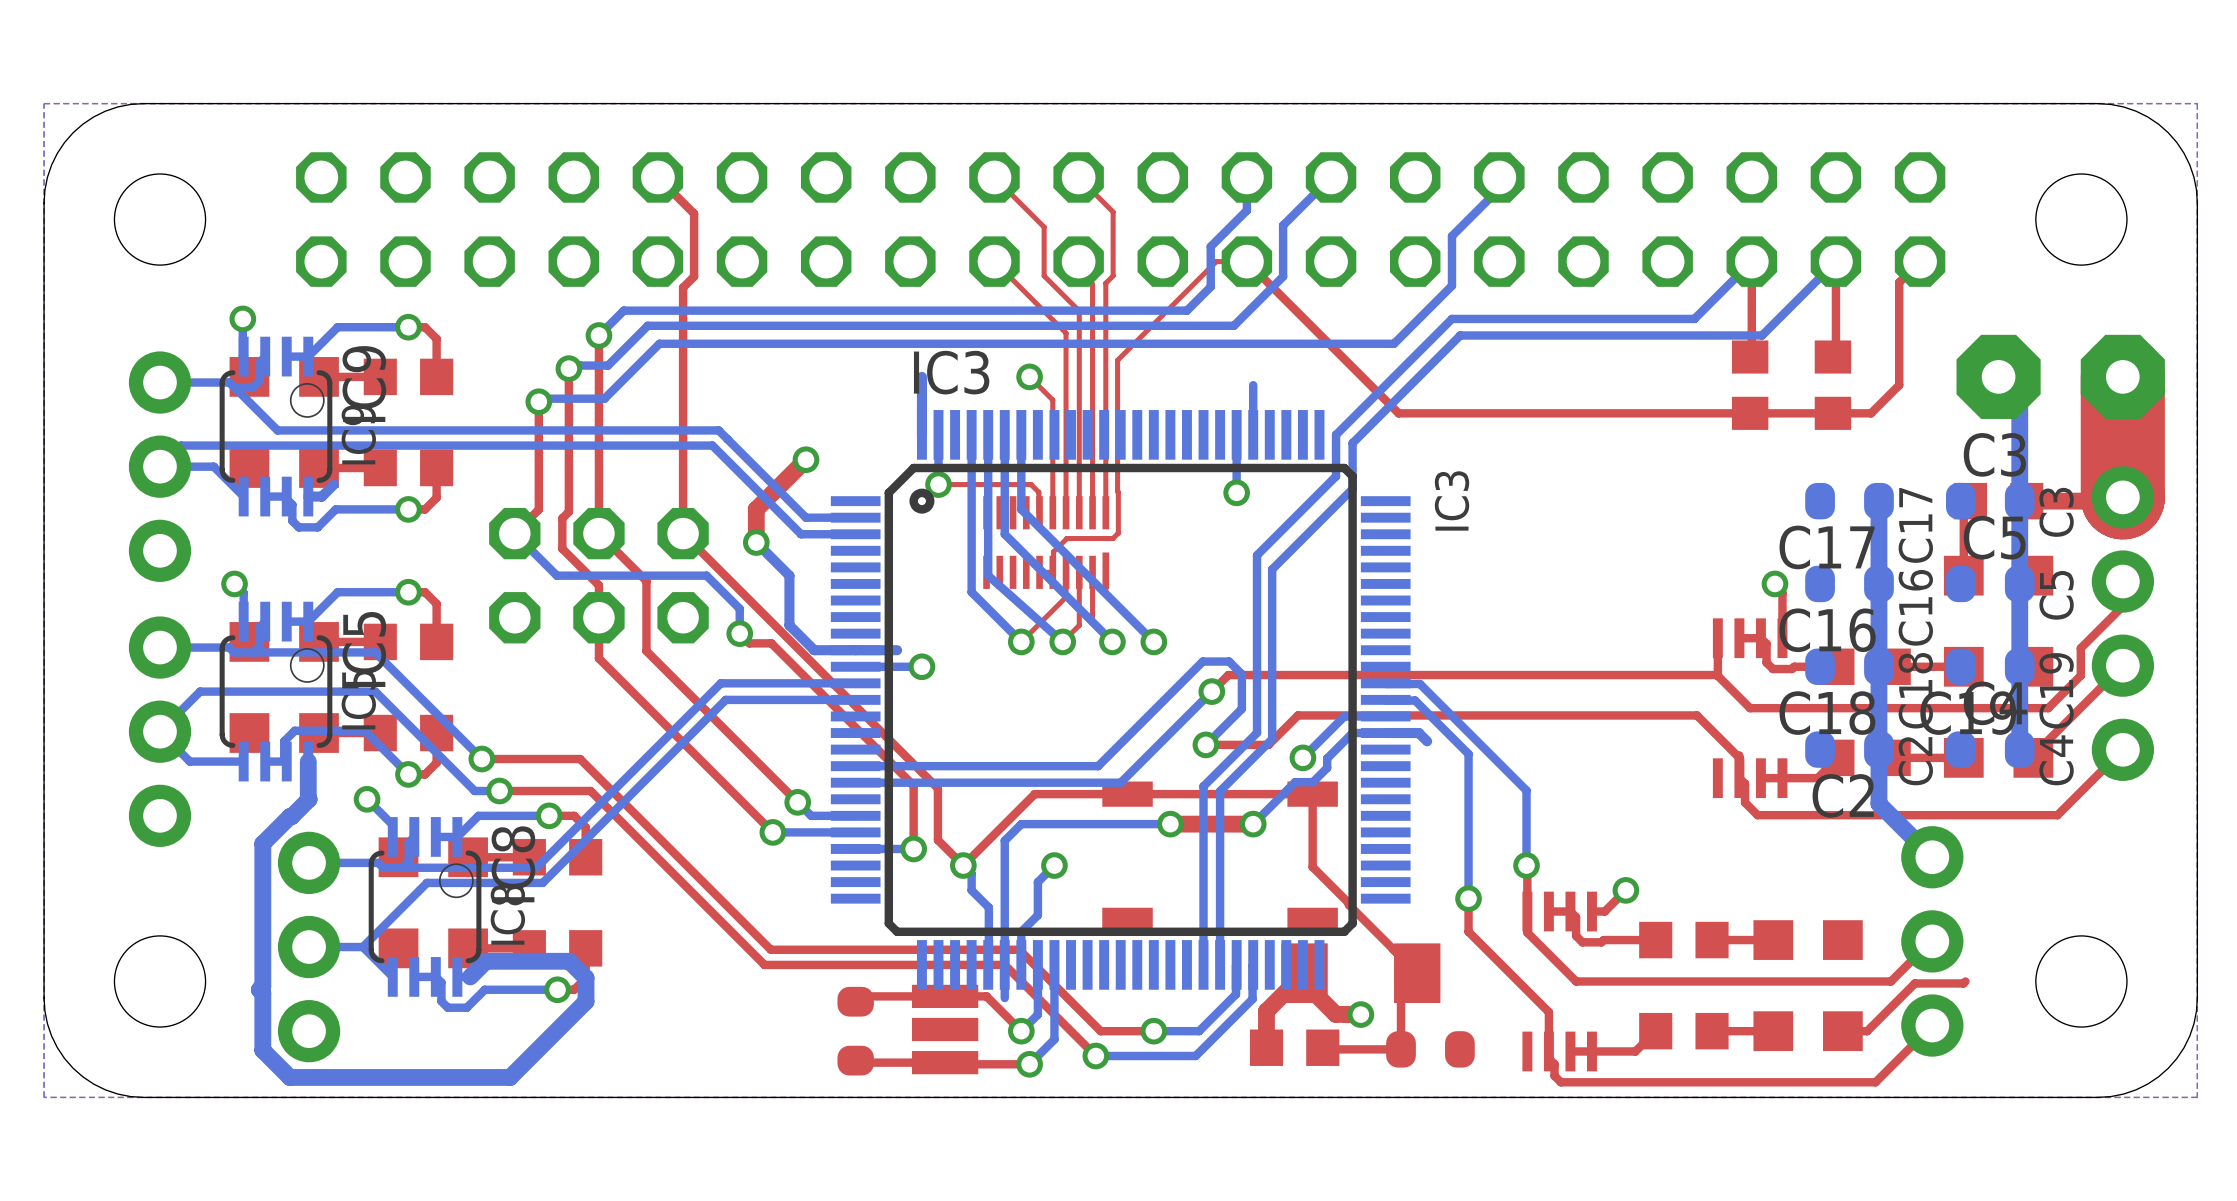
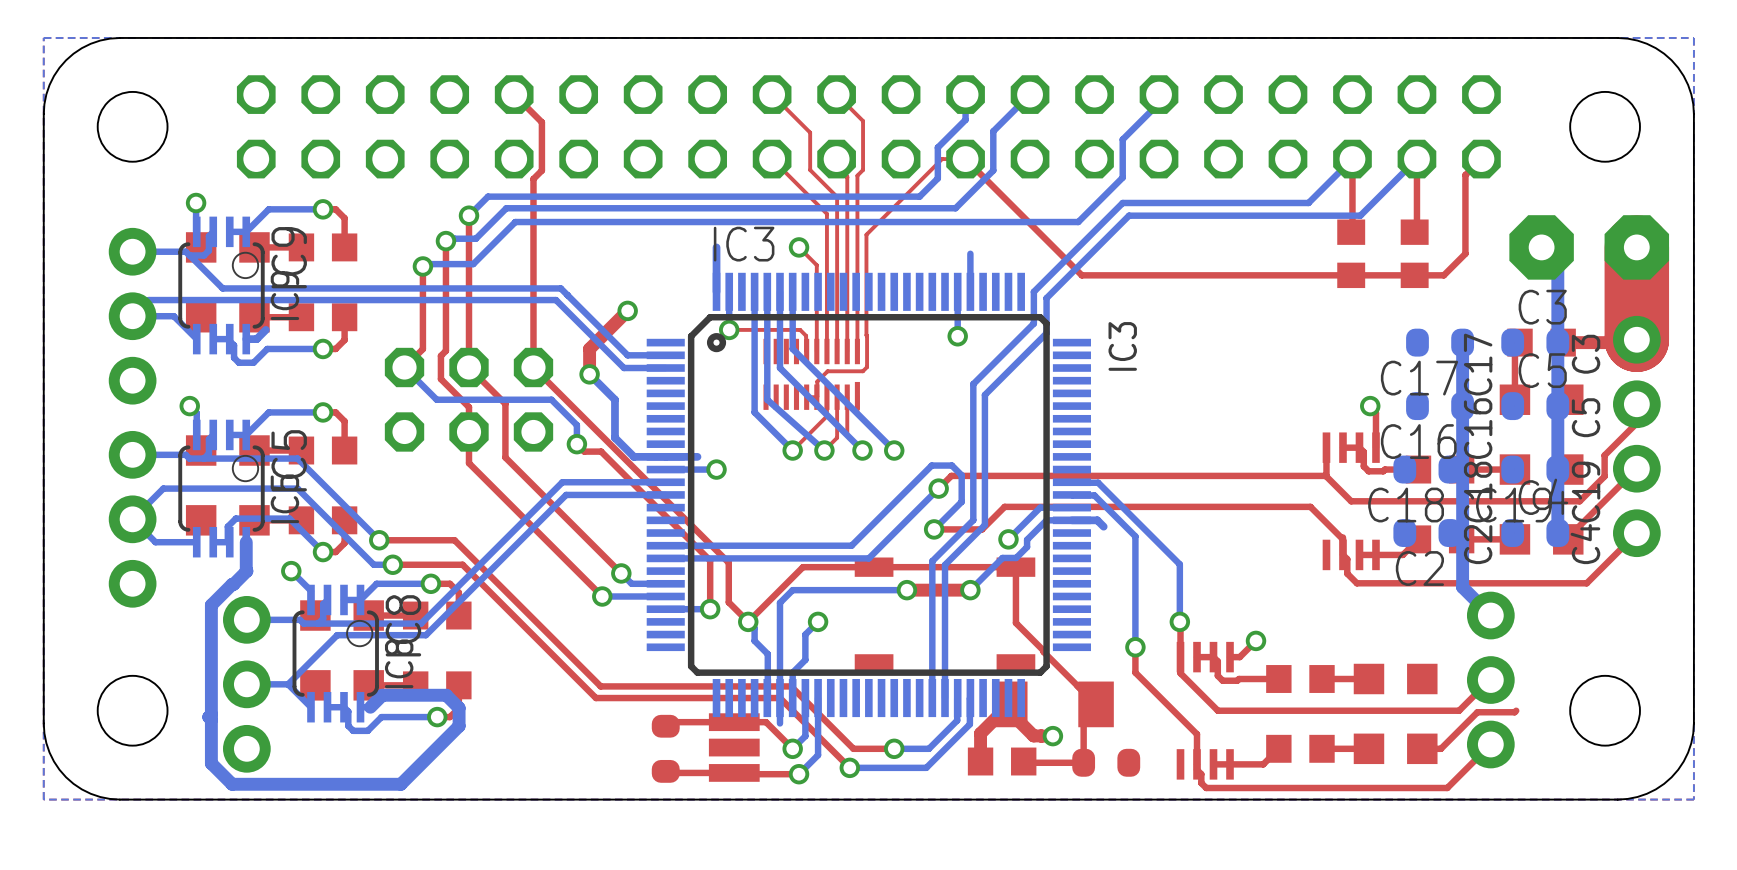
C17 position: (1849, 501) -> (1440, 342)
bottom track: (1878, 501) (1878, 803) (1895, 820) -> (1462, 342) (1462, 587)
C16 position: (1849, 583) -> (1440, 406)

